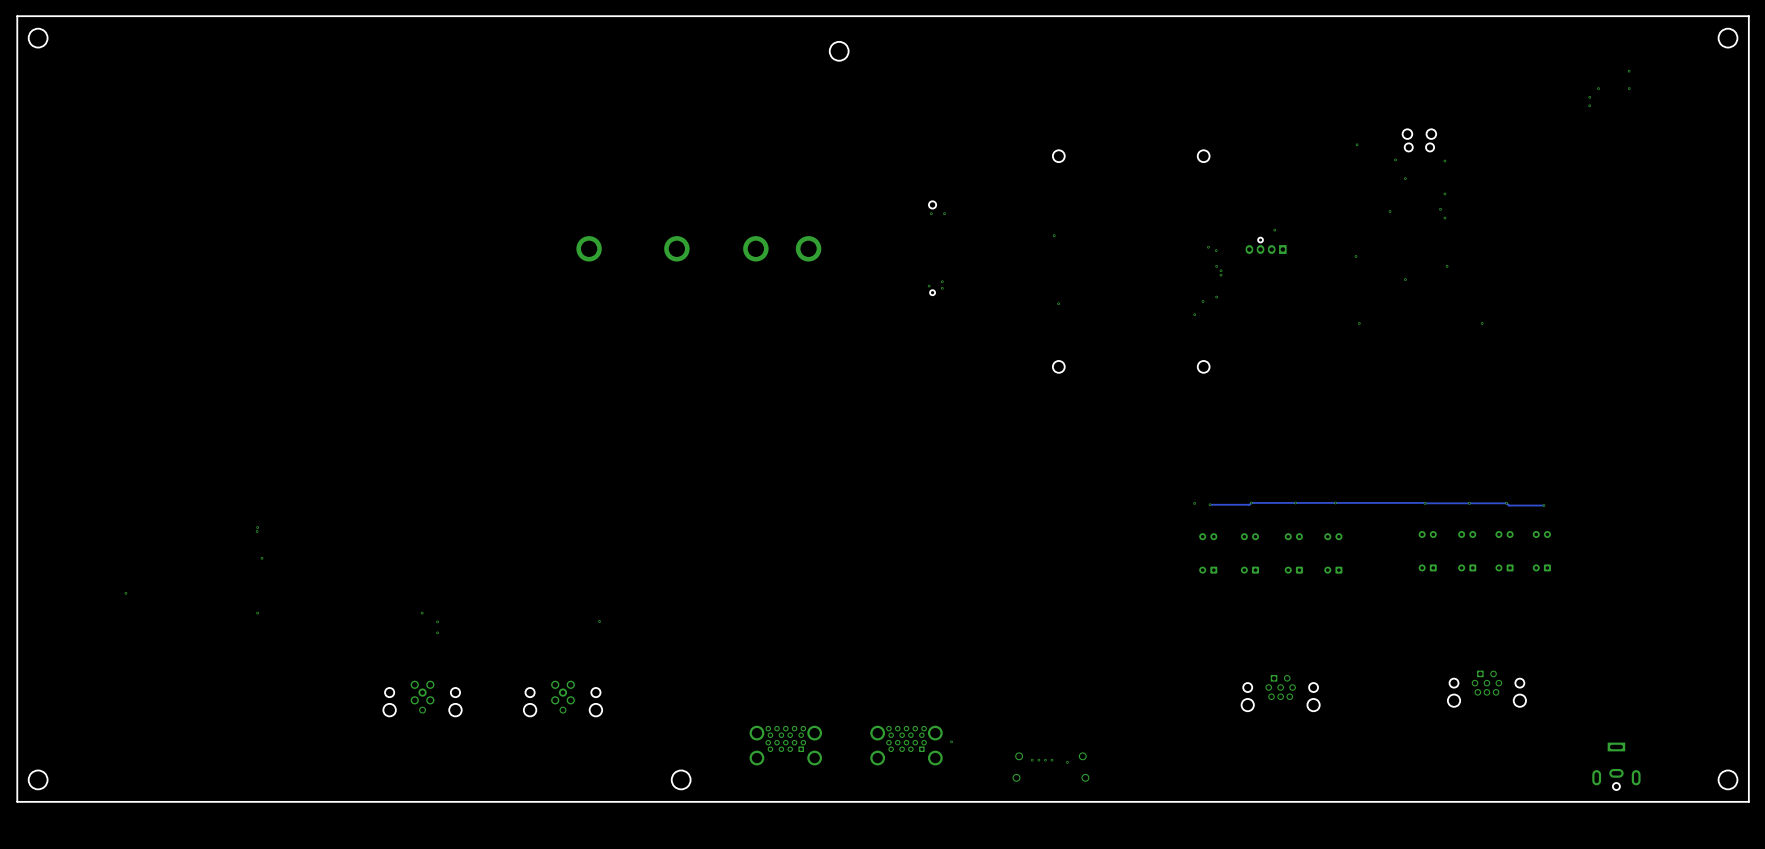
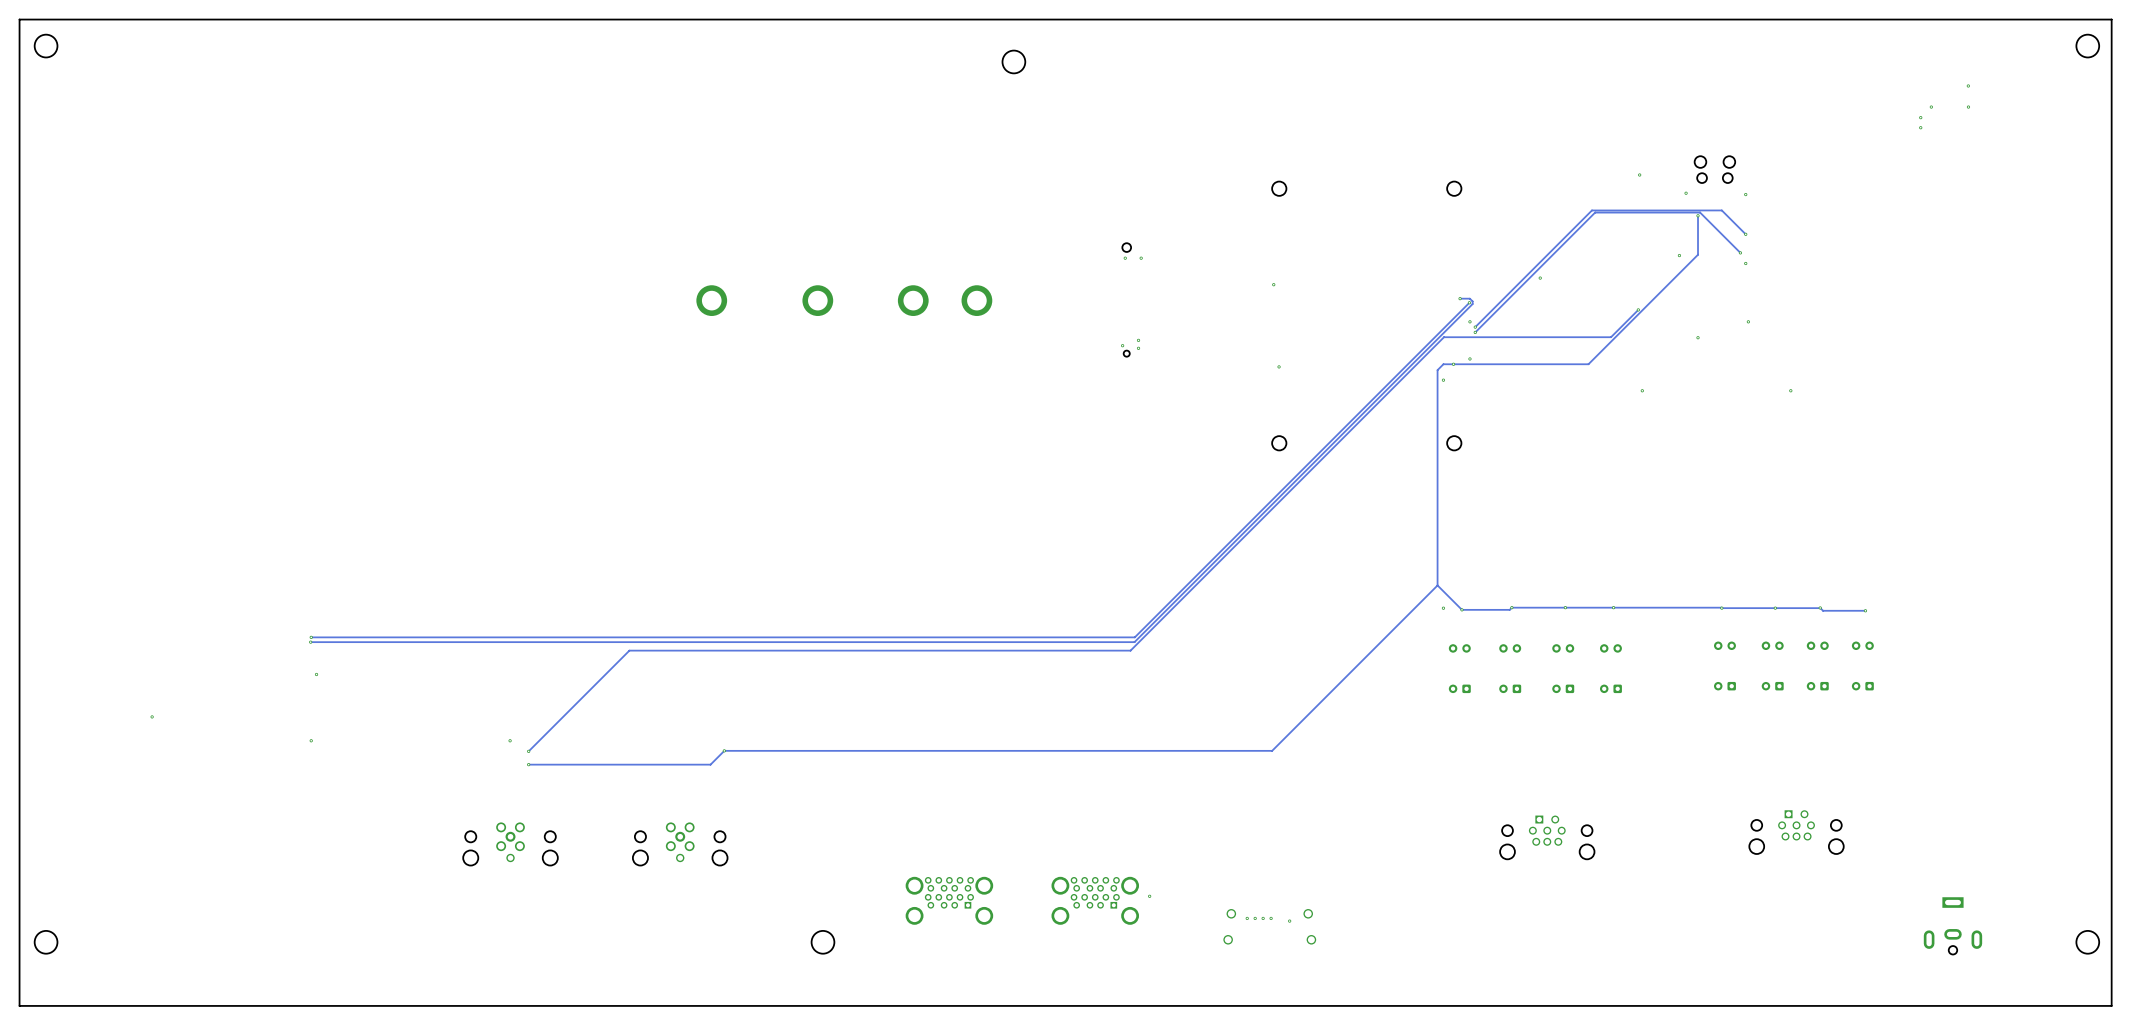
board edge: (1747, 16) (1748, 801) (17, 801) (17, 16) -> (2111, 19) (2111, 1005) (19, 1005) (20, 19)
track: none -> (1698, 215) (1698, 254) (1588, 364) (1443, 364) (1437, 370) (1437, 585)
track: none -> (1745, 234) (1721, 210) (1591, 210) (1475, 327)
track: none -> (1740, 252) (1700, 212) (1595, 212) (1475, 332)
part: (1266, 245) -> none
track: none -> (1460, 298) (1469, 298) (1472, 304) (1134, 642) (310, 642)
track: none -> (1469, 302) (1134, 637) (311, 637)
track: none -> (1638, 309) (1611, 337) (1443, 337) (1130, 650) (629, 650) (528, 751)
track: none -> (1437, 585) (1272, 750) (724, 750) (710, 764) (528, 764)
track: none -> (1437, 585) (1461, 609)

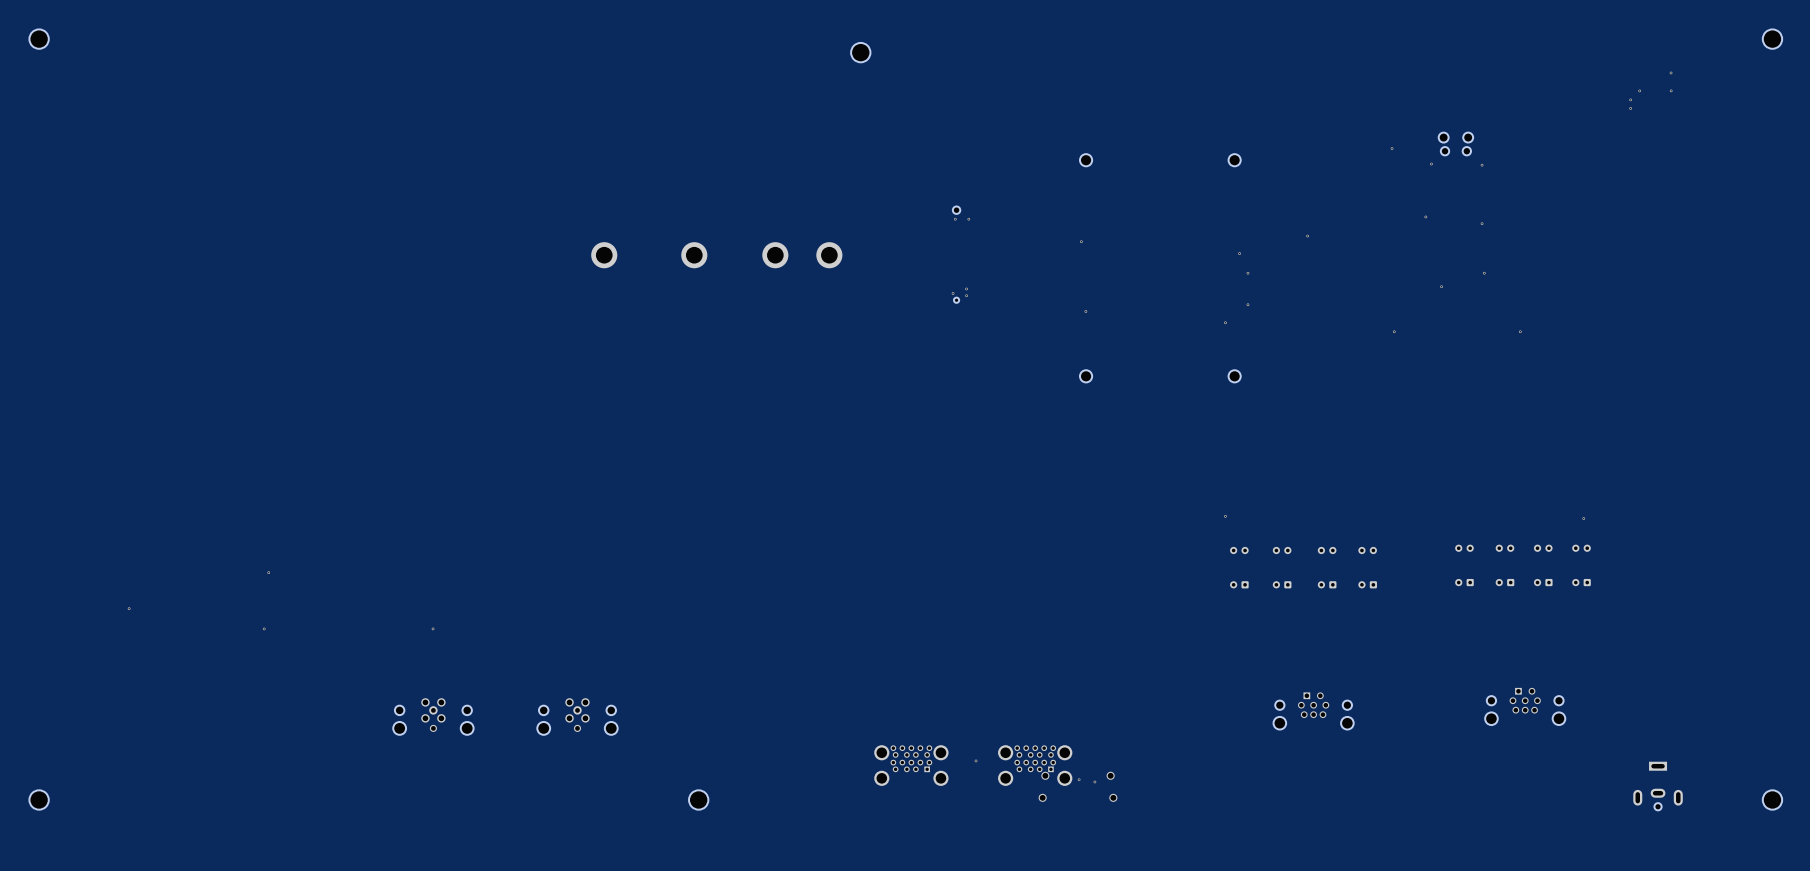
board edge: (2111, 19) (19, 19) (19, 1005) (2111, 1005) (2111, 19) -> none
track: (1698, 215) (1698, 254) (1588, 364) (1443, 364) (1437, 370) (1437, 585) -> none
via: (1698, 215) -> none
track: (1745, 234) (1721, 210) (1591, 210) (1475, 327) -> none
via: (1745, 234) -> none
track: (1740, 252) (1700, 212) (1595, 212) (1475, 332) -> none
via: (1740, 252) -> none
track: (1460, 298) (1469, 298) (1472, 304) (1134, 642) (310, 642) -> none
track: (1469, 302) (1134, 637) (311, 637) -> none
via: (1469, 302) -> none
track: (1638, 309) (1611, 337) (1443, 337) (1130, 650) (629, 650) (528, 751) -> none
via: (1638, 309) -> none
via: (1475, 327) -> none
via: (1475, 332) -> none
via: (1453, 364) -> none
track: (1437, 585) (1272, 750) (724, 750) (710, 764) (528, 764) -> none
track: (1437, 585) (1461, 609) (1509, 609) (1511, 607) (1721, 607) (1820, 607) (1823, 610) (1865, 610) -> none
via: (1511, 607) -> none
via: (1565, 607) -> none
via: (1613, 607) -> none
via: (1820, 607) -> none
via: (1721, 608) -> none
via: (1775, 608) -> none
via: (1461, 609) -> none
via: (311, 637) -> none
via: (310, 642) -> none
via: (724, 750) -> none
via: (528, 751) -> none
via: (528, 764) -> none
part: (949, 900) -> none
part position: (1095, 900) -> (911, 765)
part: none -> (1035, 765)
via: (1247, 918) -> none
via: (1255, 918) -> none
via: (1263, 918) -> none

